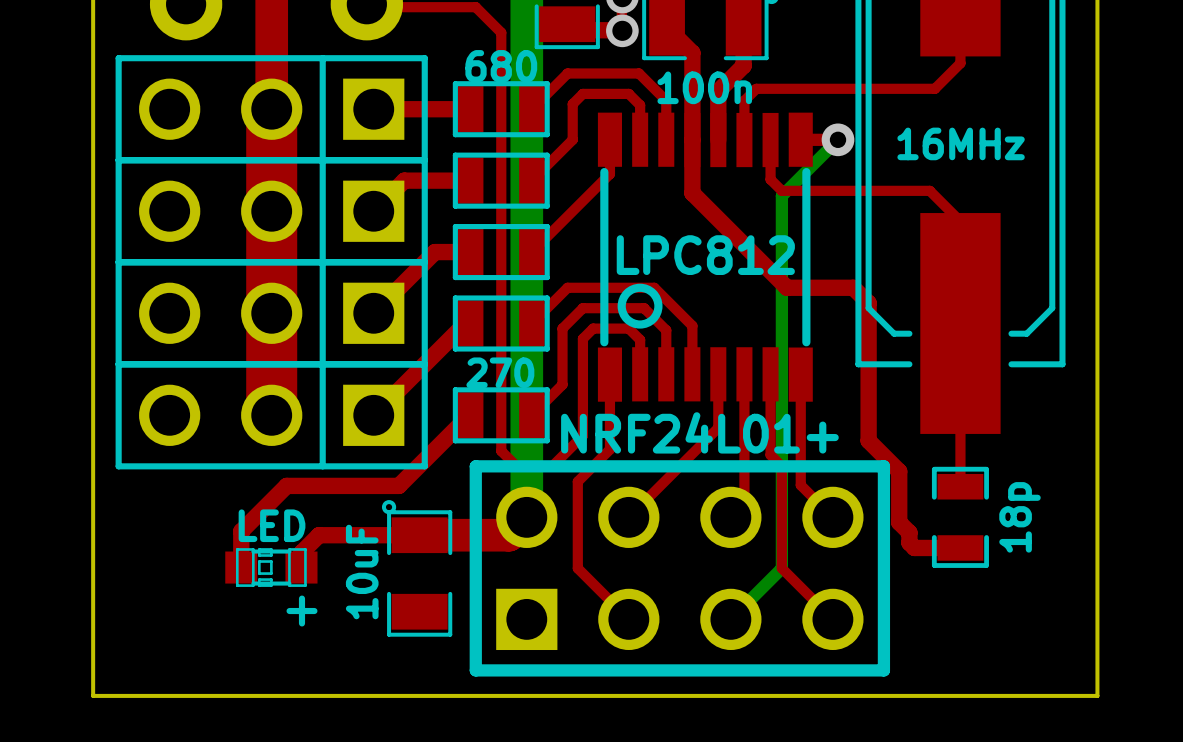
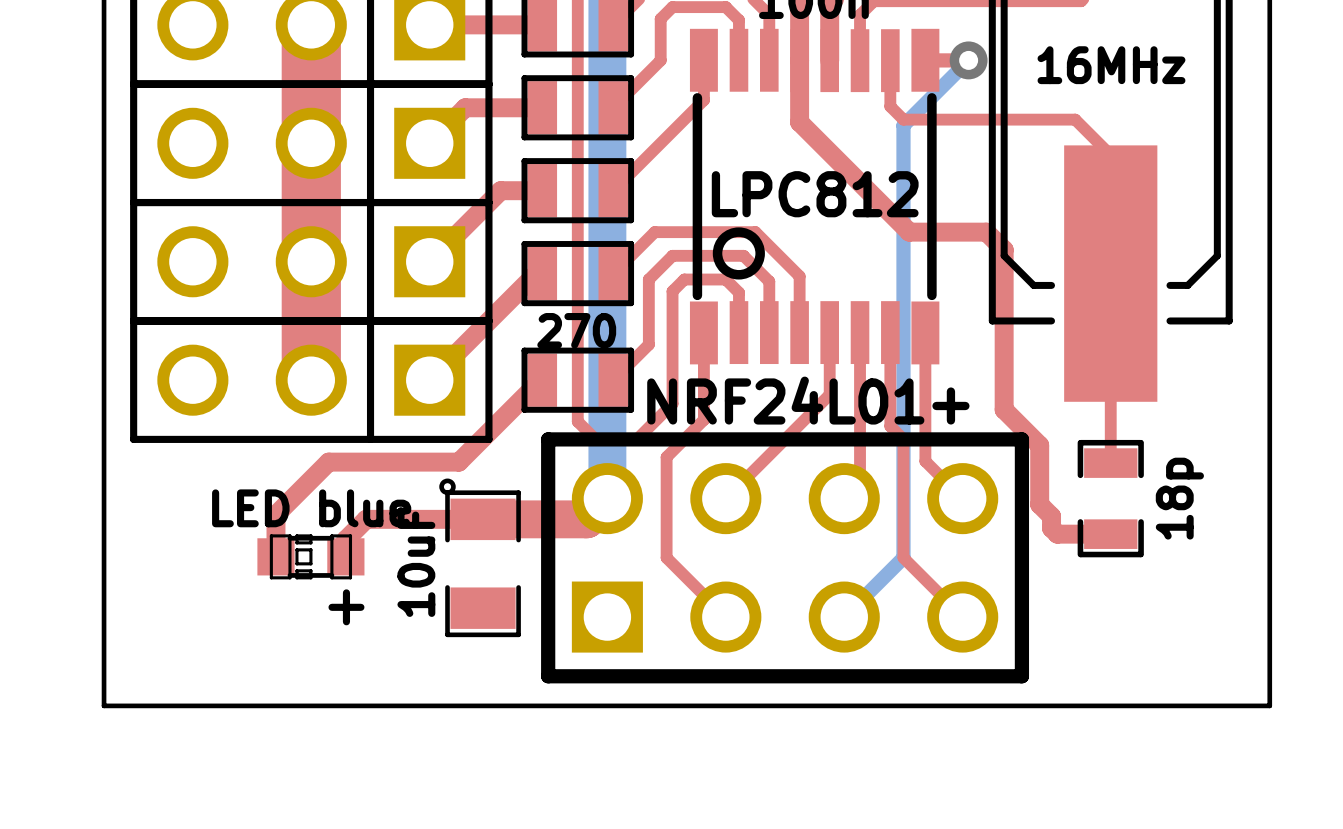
part value: LED (272, 525) -> LED blue (311, 508)

